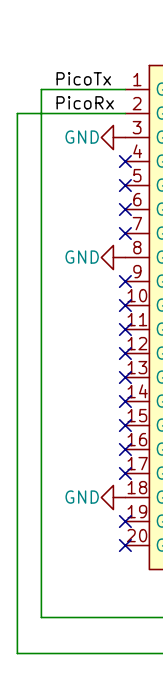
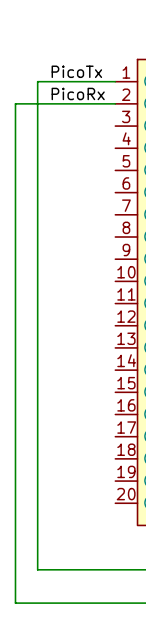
power symbol: GND (113, 137) -> none
no-connect mark: (125, 161) -> none
no-connect mark: (125, 185) -> none
no-connect mark: (125, 209) -> none
no-connect mark: (125, 233) -> none
power symbol: GND (113, 257) -> none
no-connect mark: (125, 281) -> none
no-connect mark: (125, 305) -> none
no-connect mark: (125, 329) -> none
no-connect mark: (125, 353) -> none
no-connect mark: (125, 377) -> none
no-connect mark: (125, 401) -> none
no-connect mark: (125, 425) -> none
no-connect mark: (125, 449) -> none
no-connect mark: (125, 473) -> none
power symbol: GND (113, 497) -> none
no-connect mark: (125, 521) -> none
no-connect mark: (125, 545) -> none

